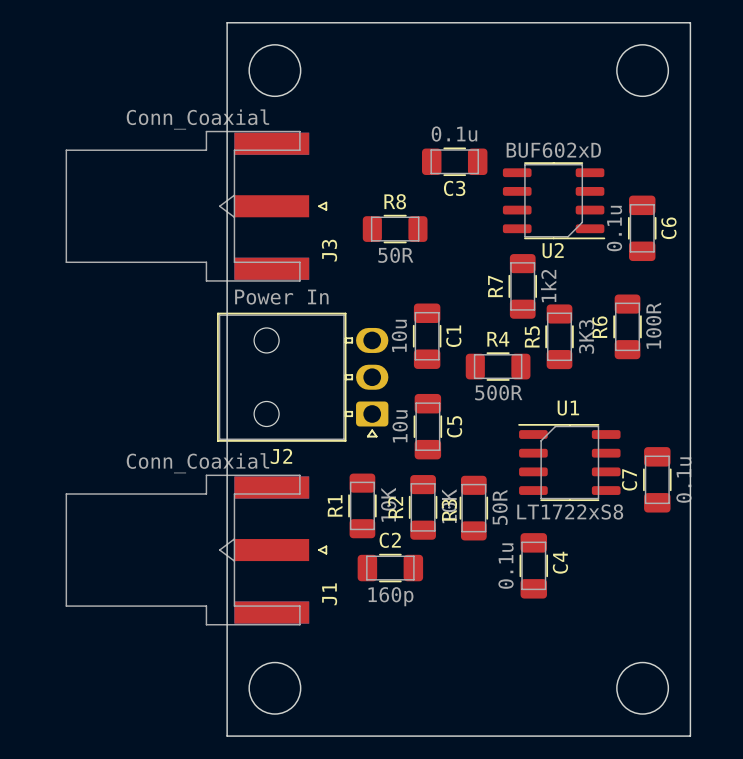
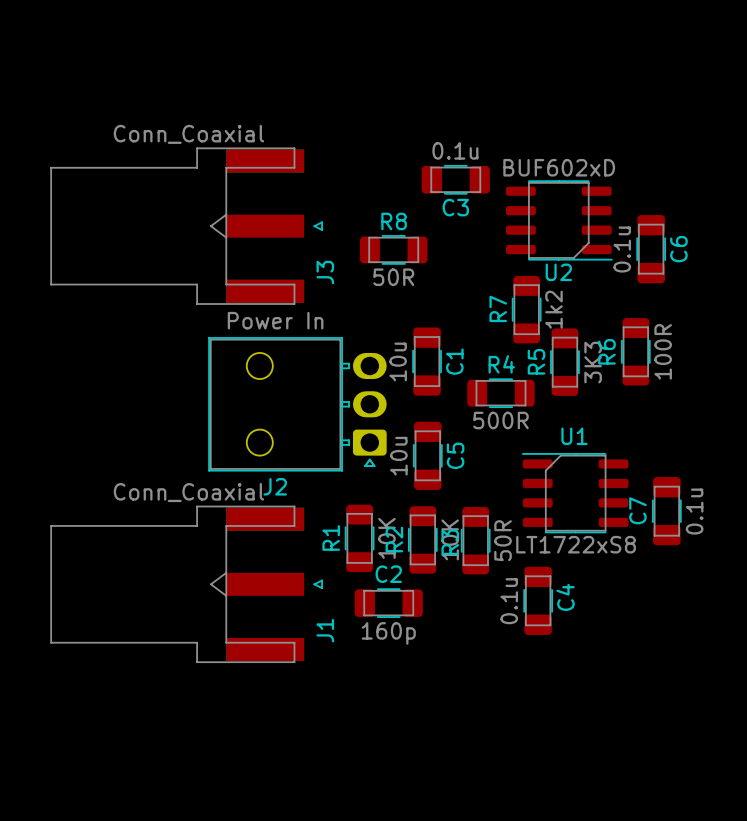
board edge: (227, 22) (690, 22) (690, 736) (227, 736) (227, 22) -> none
round board edge: [248, 44, 302, 98] -> none
round board edge: [616, 44, 670, 98] -> none
round board edge: [248, 661, 302, 715] -> none
round board edge: [616, 661, 670, 715] -> none

